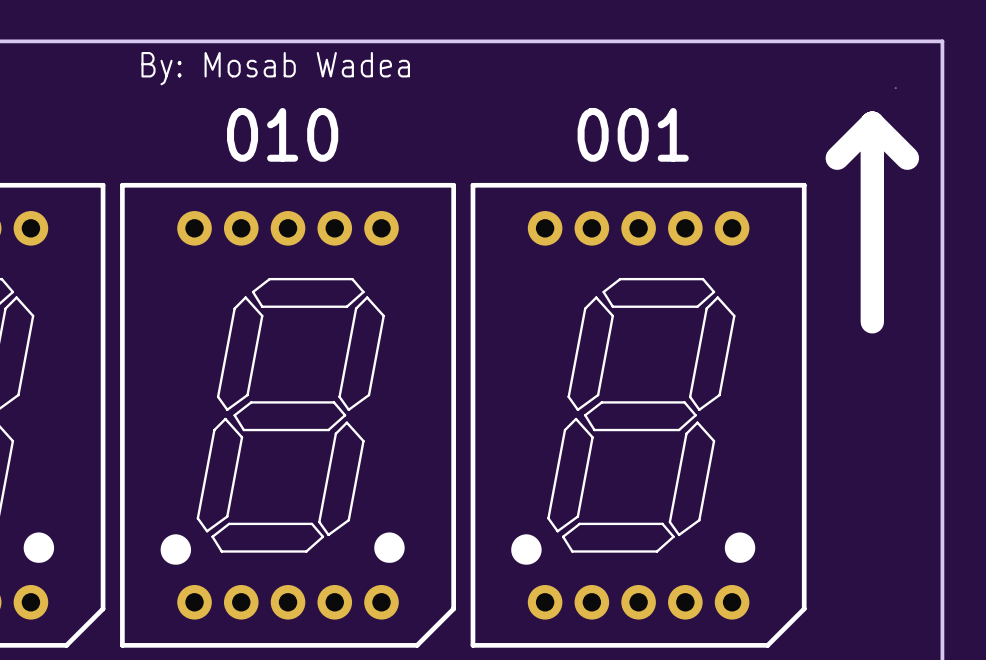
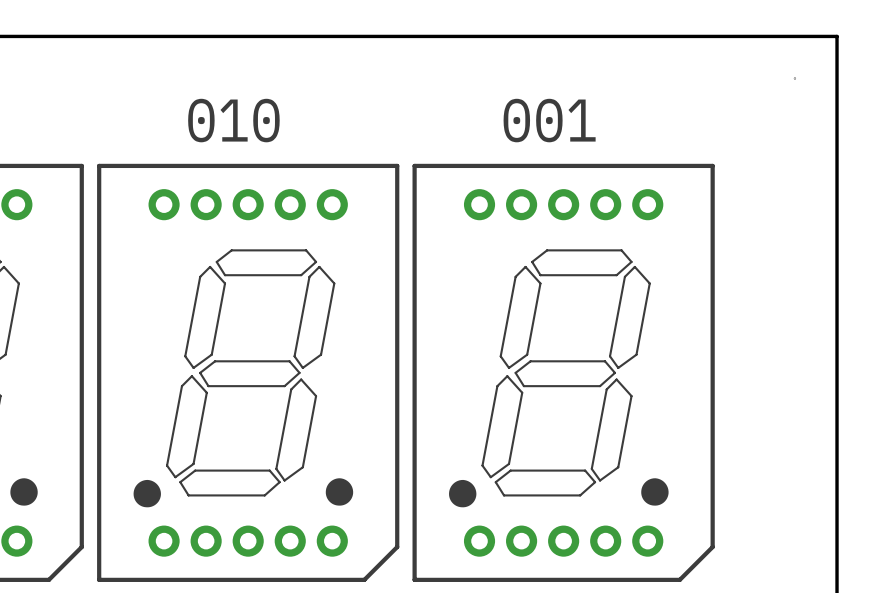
text: By: Mosab Wadea (275, 68) -> none
line: (872, 123) (872, 321) -> none
line: (872, 123) (837, 158) -> none
line: (872, 123) (907, 158) -> none

